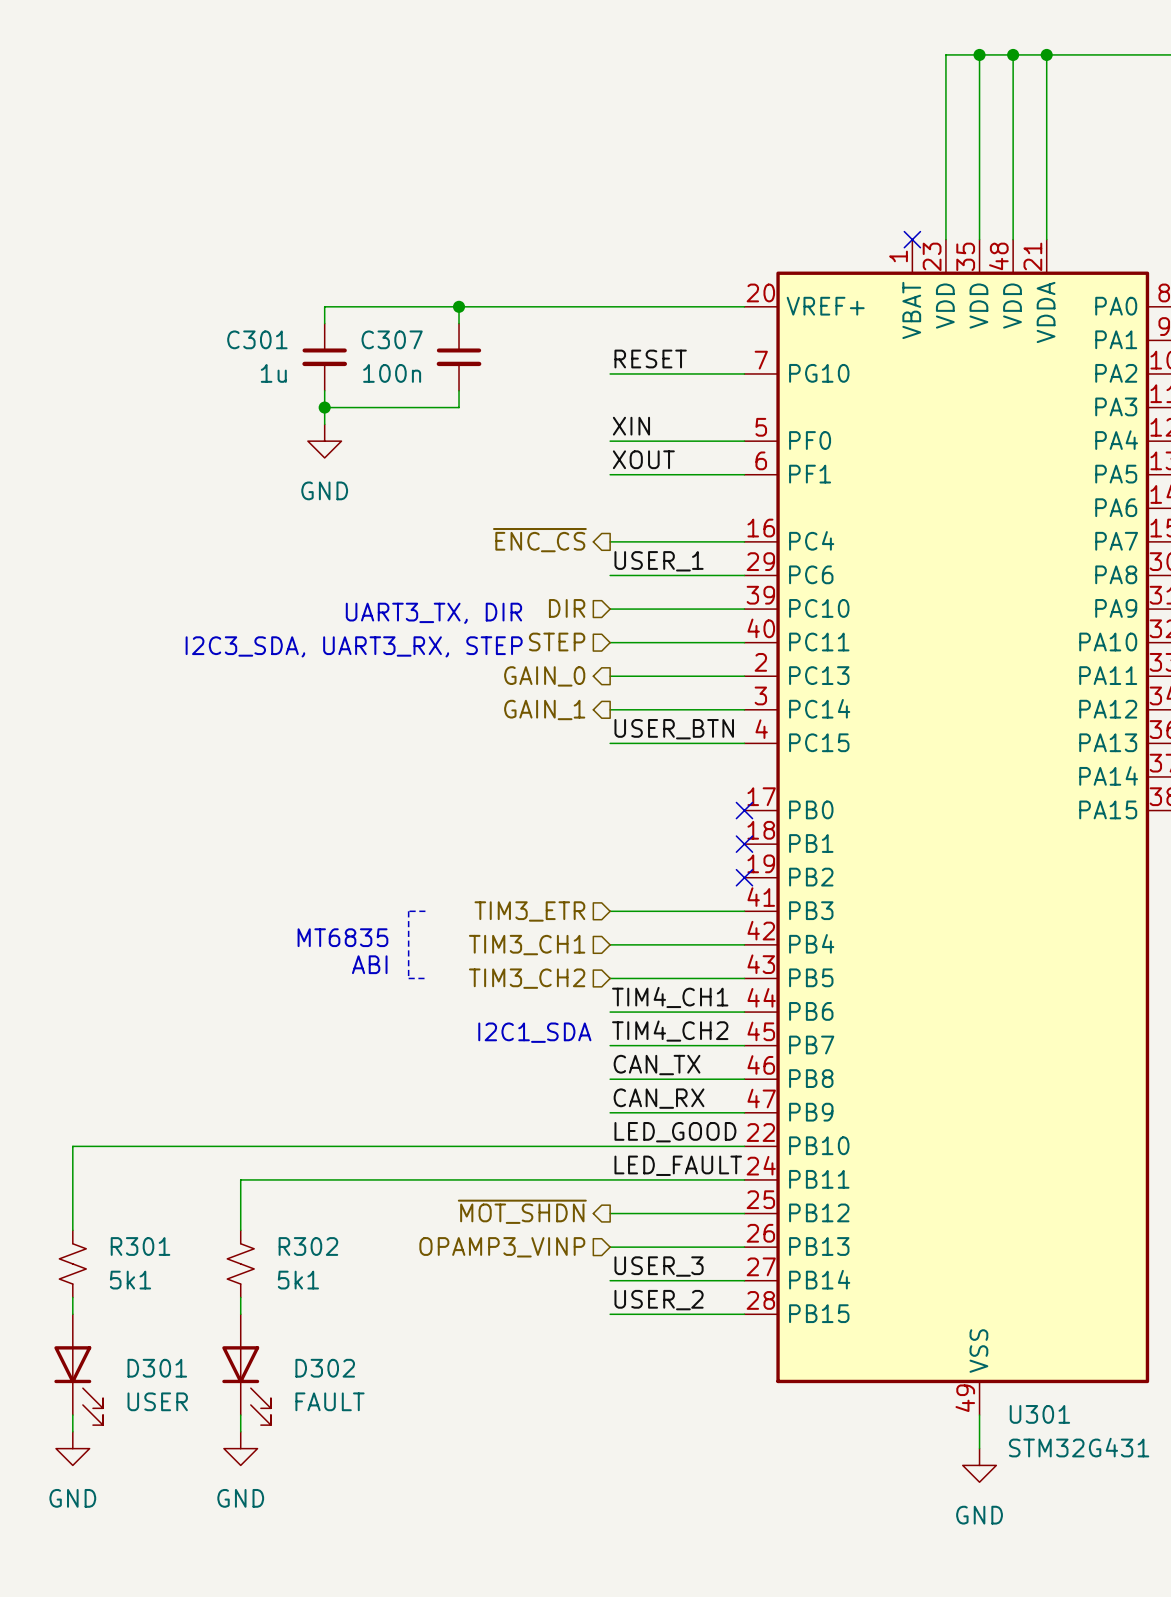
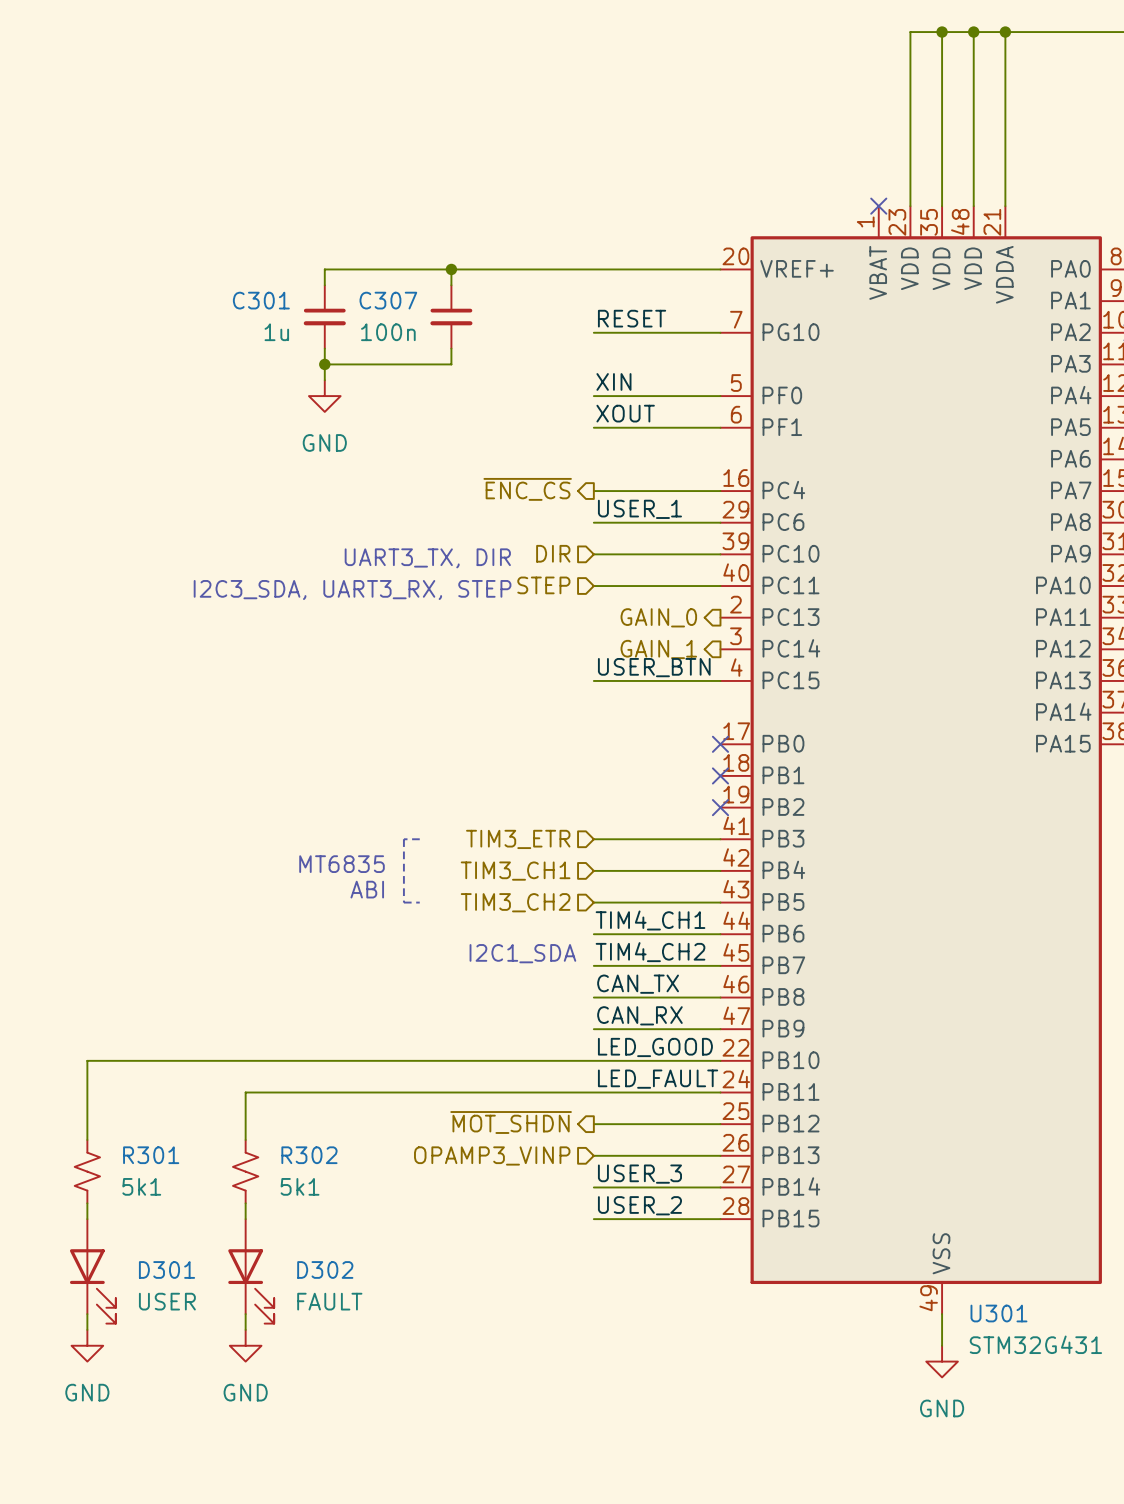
hierarchical label position: GAIN_0 (544, 676) -> GAIN_0 (658, 617)
wire: (610, 676) (744, 676) -> none
hierarchical label position: GAIN_1 (544, 709) -> GAIN_1 (658, 649)
wire: (610, 709) (744, 709) -> none

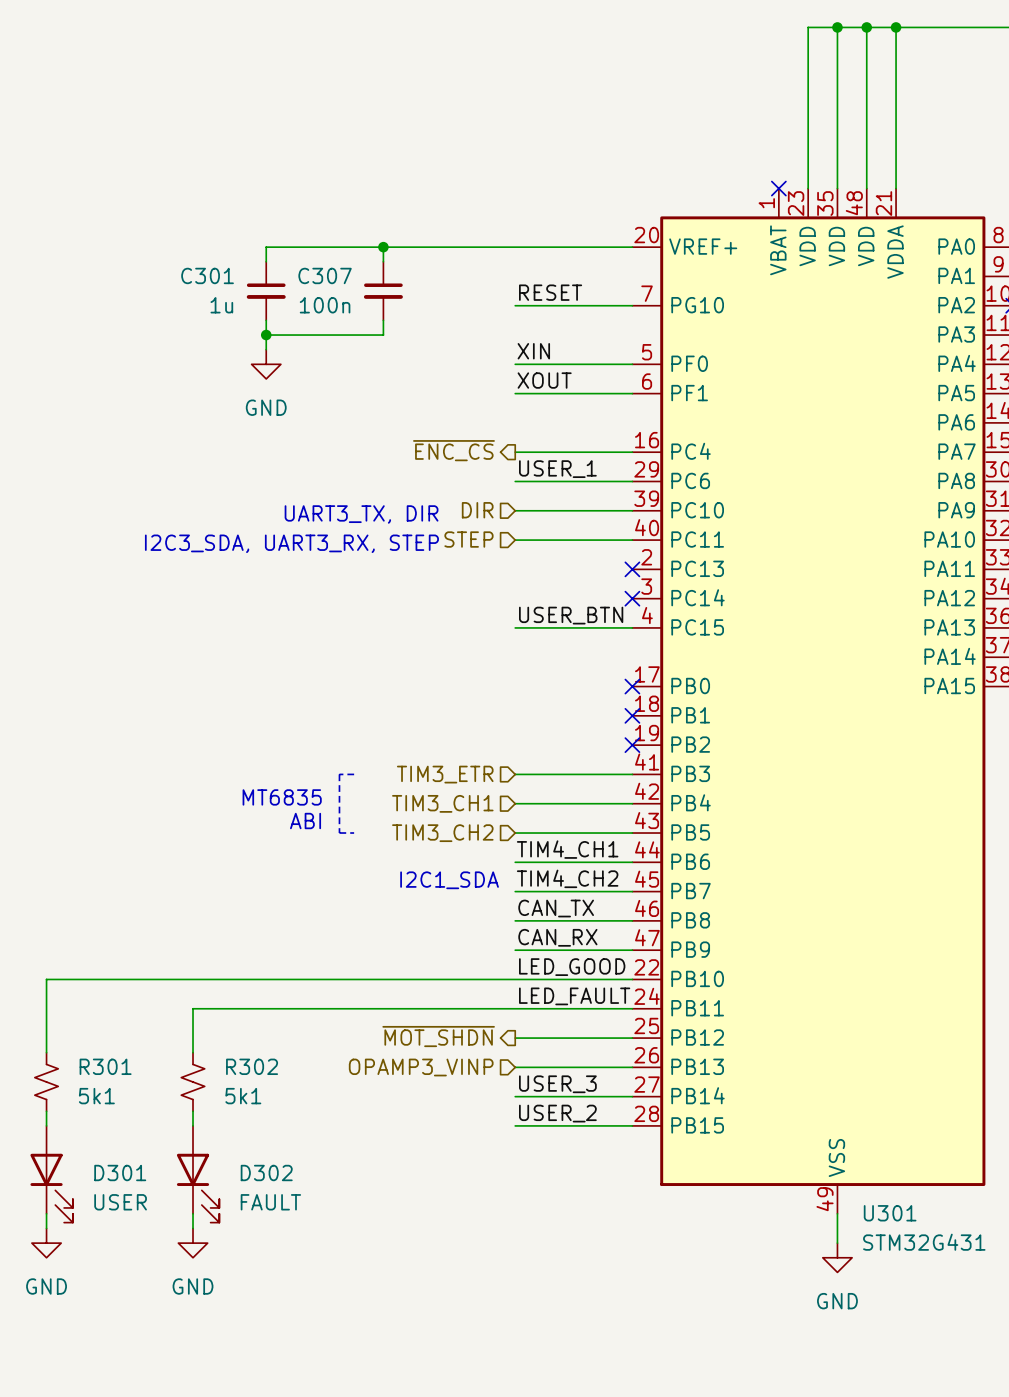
hierarchical label: GAIN_0 (658, 617) -> none
no-connect mark: none -> (632, 569)
hierarchical label: GAIN_1 (658, 649) -> none
no-connect mark: none -> (632, 598)

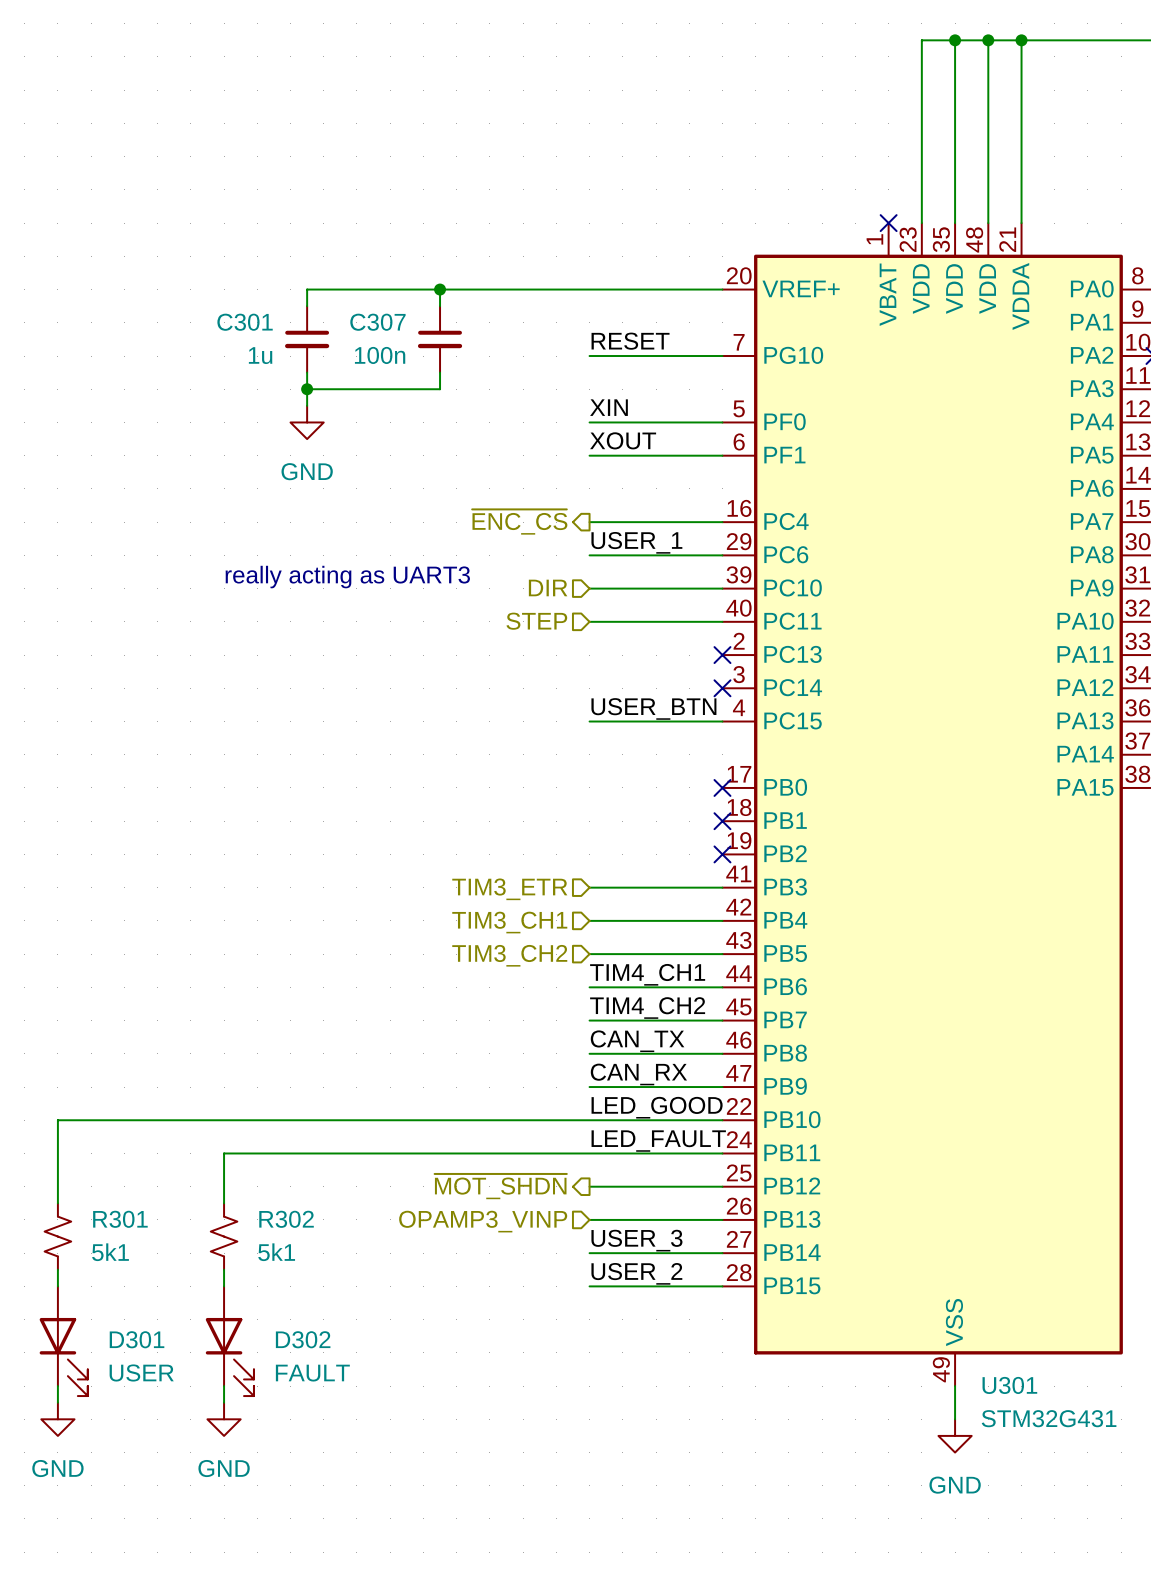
text: none -> really acting as UART3 (347, 577)
text: UART3_TX, DIR (361, 514) -> none
text: I2C3_SDA, UART3_RX, STEP (291, 543) -> none
line: (354, 774) (339, 774) (339, 833) (354, 833) -> none
text: MT6835 (282, 797) -> none
text: ABI (305, 821) -> none
text: I2C1_SDA (449, 880) -> none

